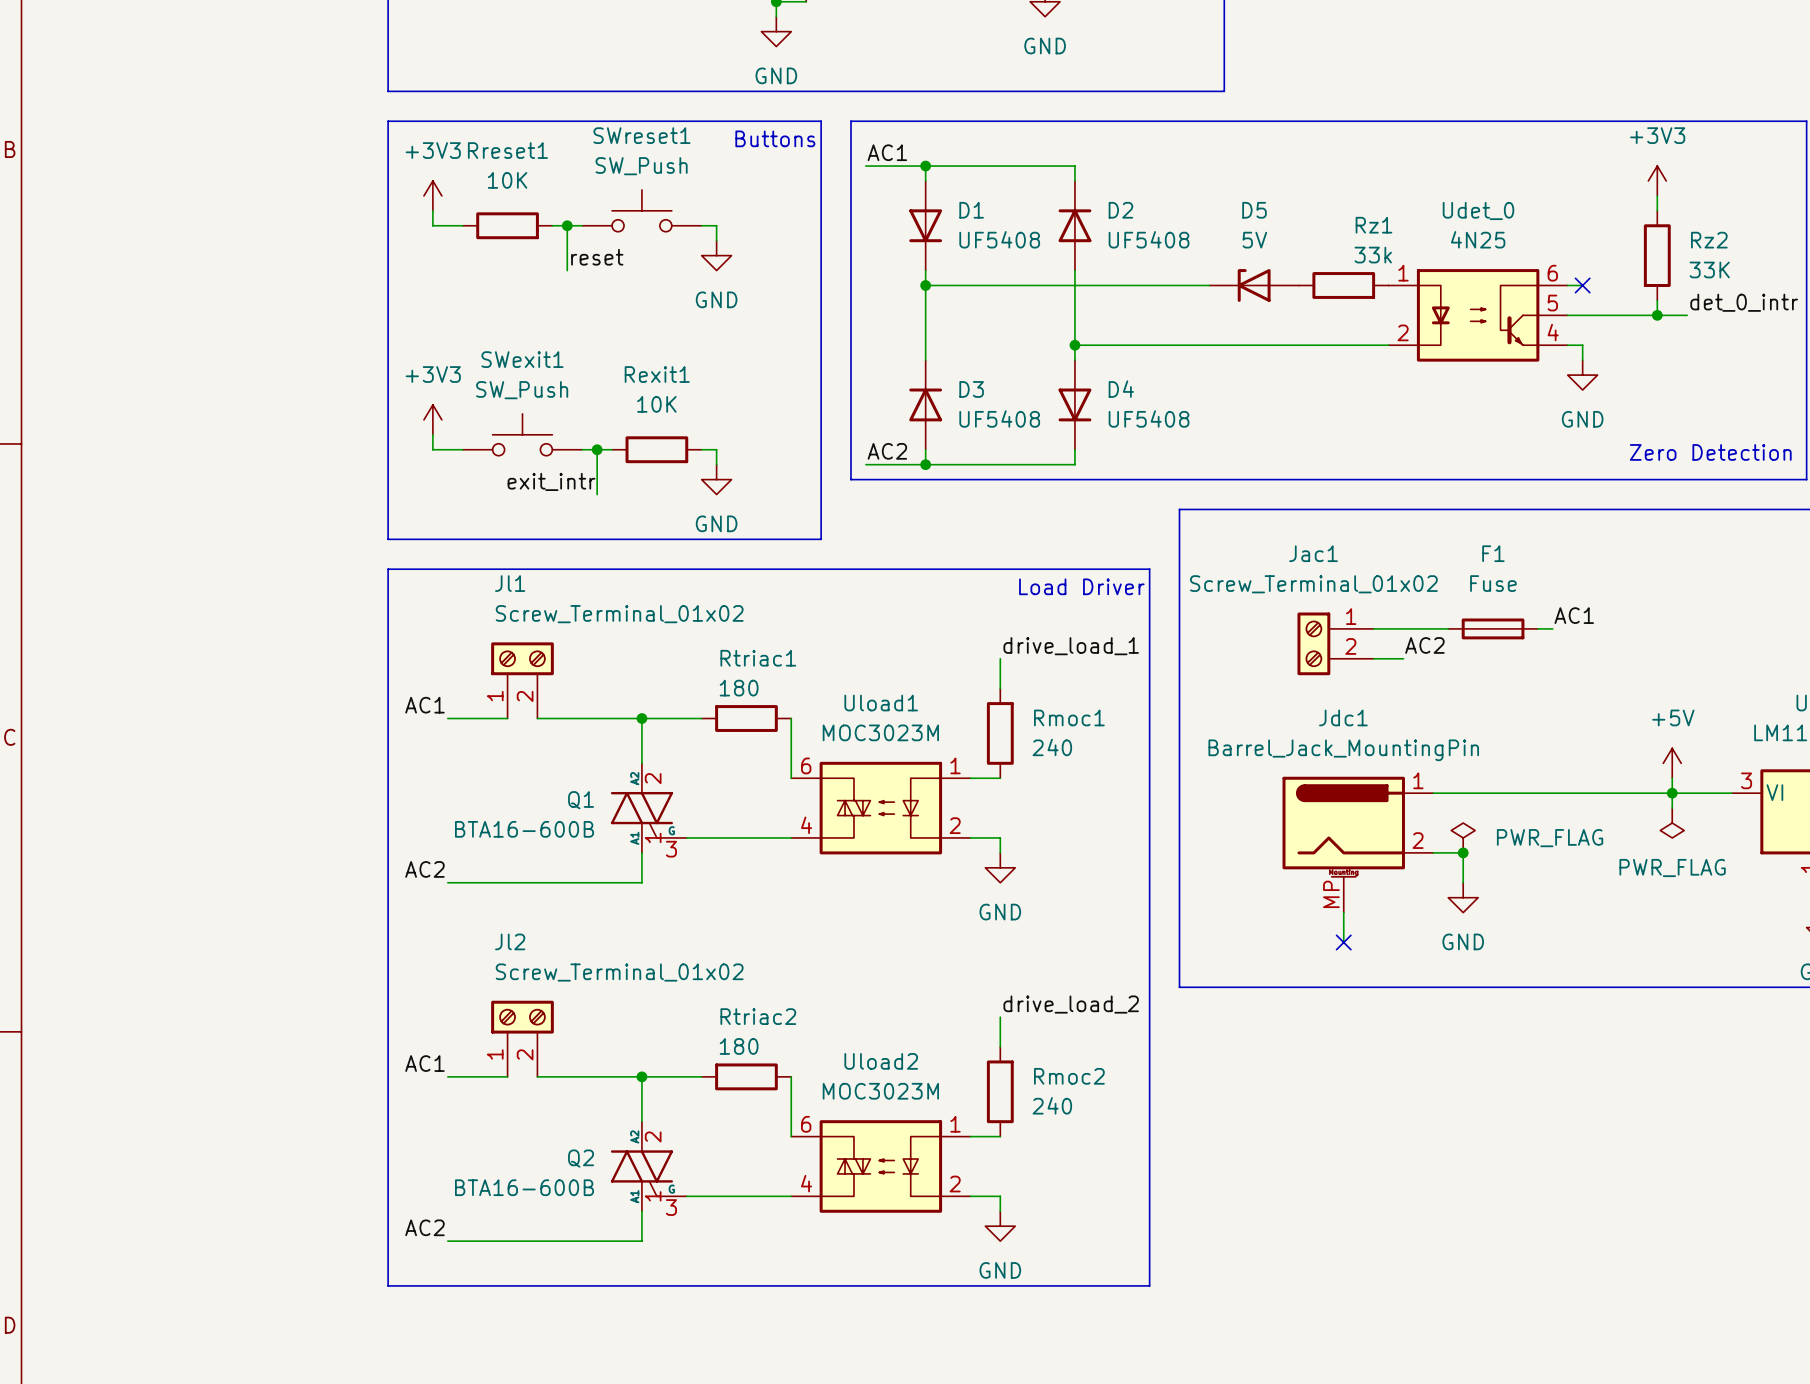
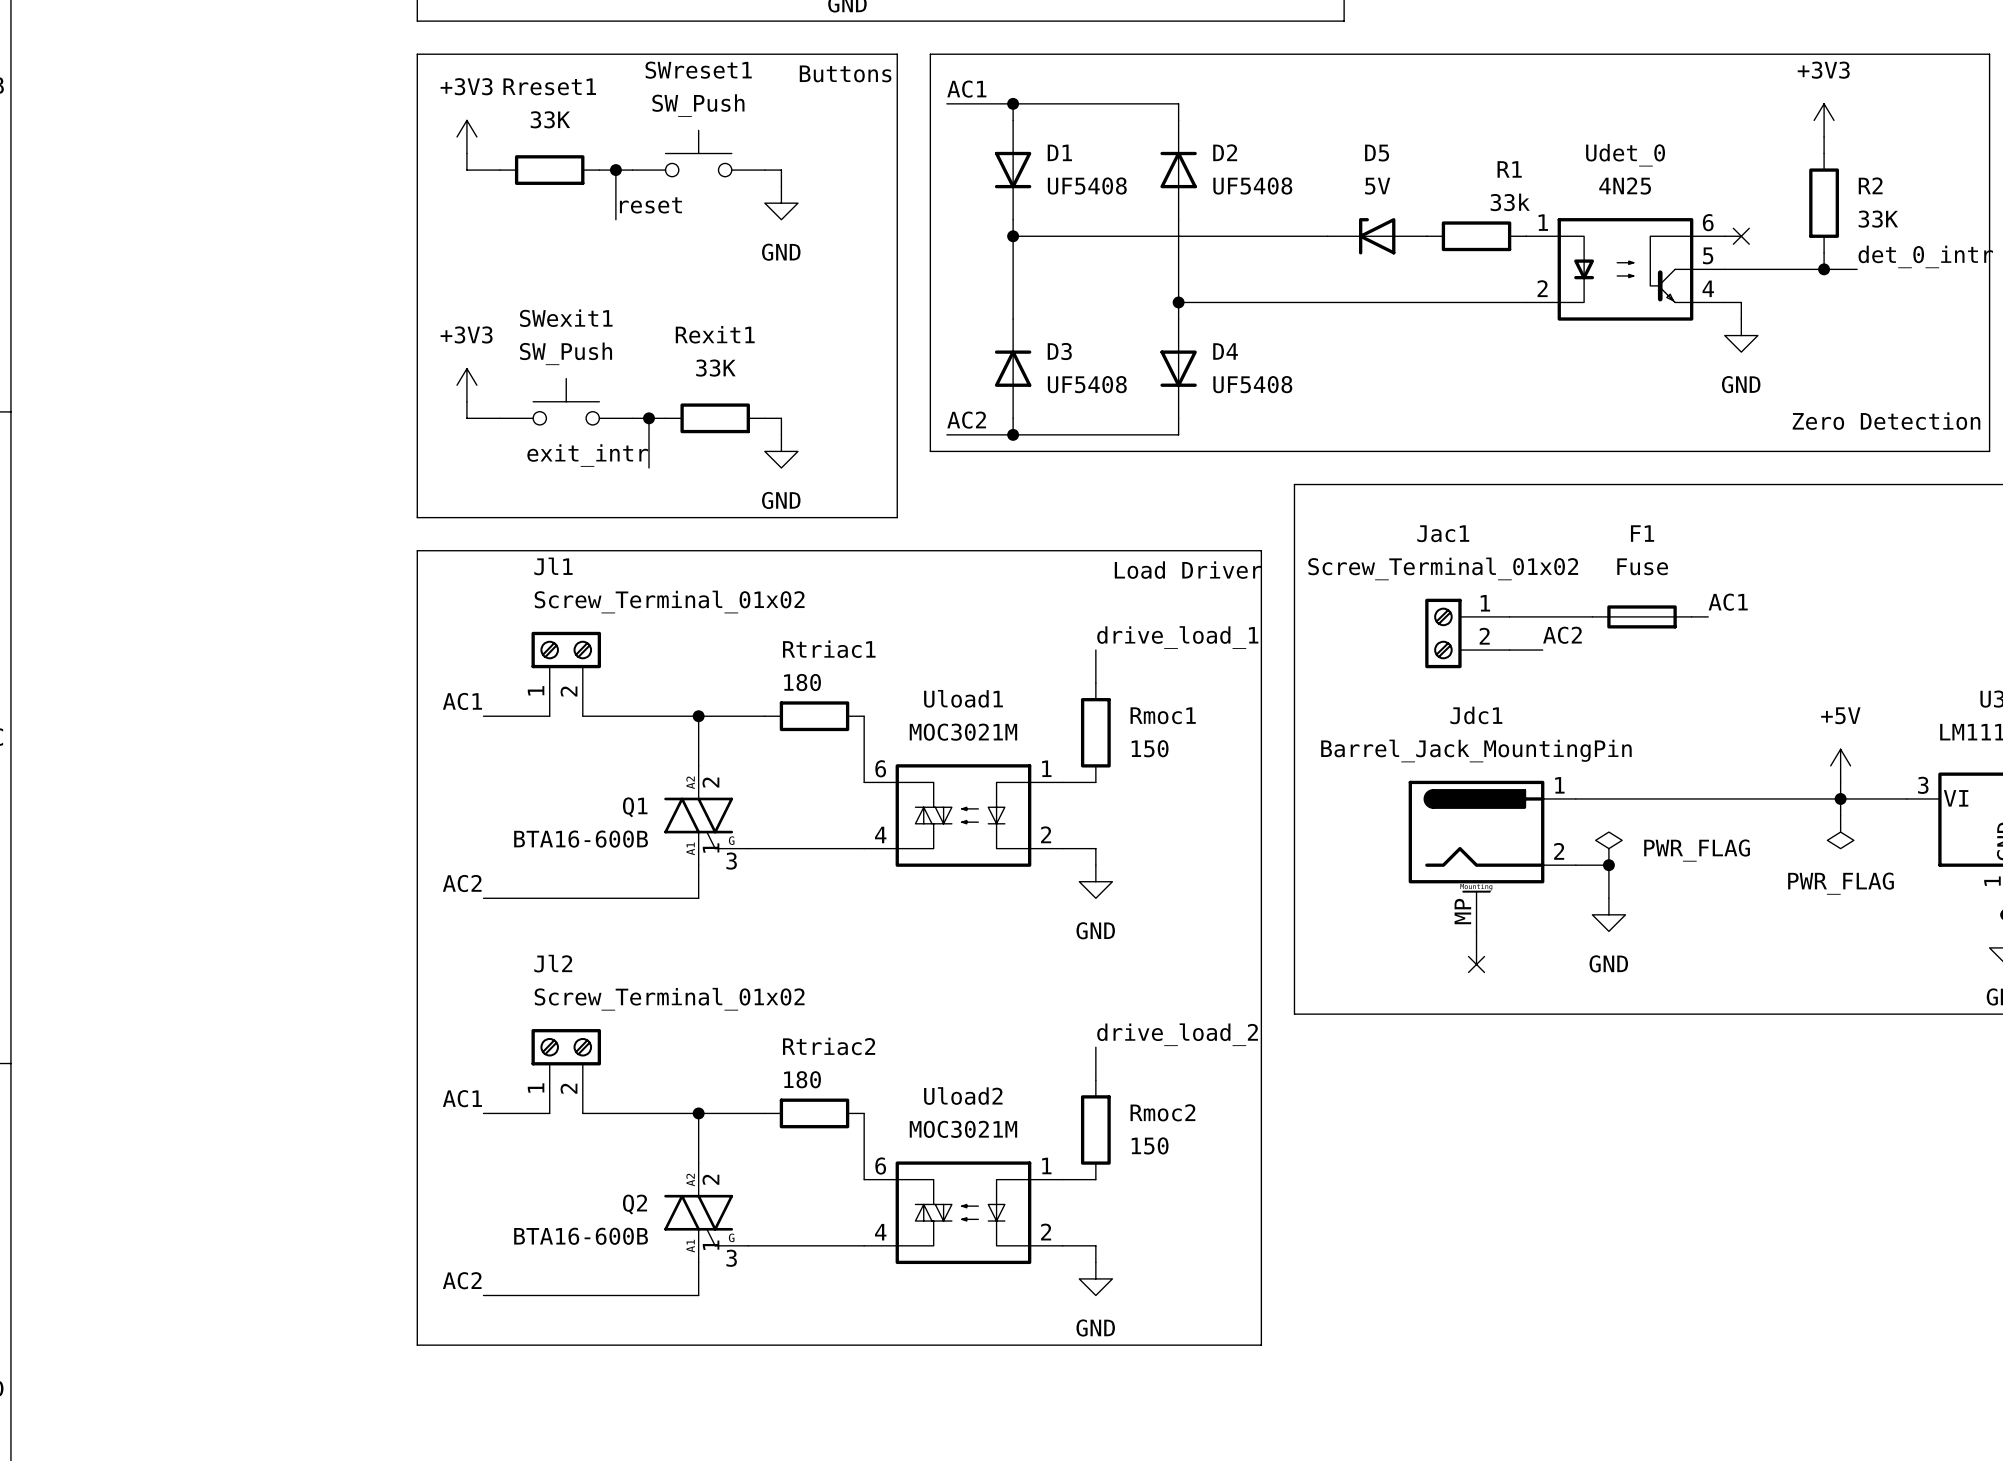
Rreset1 value: 10K (507, 180) -> 33K (550, 119)
Rz1 name: Rz1 (1373, 225) -> R1 (1509, 169)
Rz2 name: Rz2 (1709, 240) -> R2 (1870, 185)
Rexit1 value: 10K (656, 404) -> 33K (715, 368)
Uload1 value: MOC3023M (880, 732) -> MOC3021M (963, 732)
Rmoc1 value: 240 (1052, 747) -> 150 (1150, 748)
Uload2 value: MOC3023M (880, 1091) -> MOC3021M (963, 1129)
Rmoc2 value: 240 (1052, 1105) -> 150 (1150, 1145)

